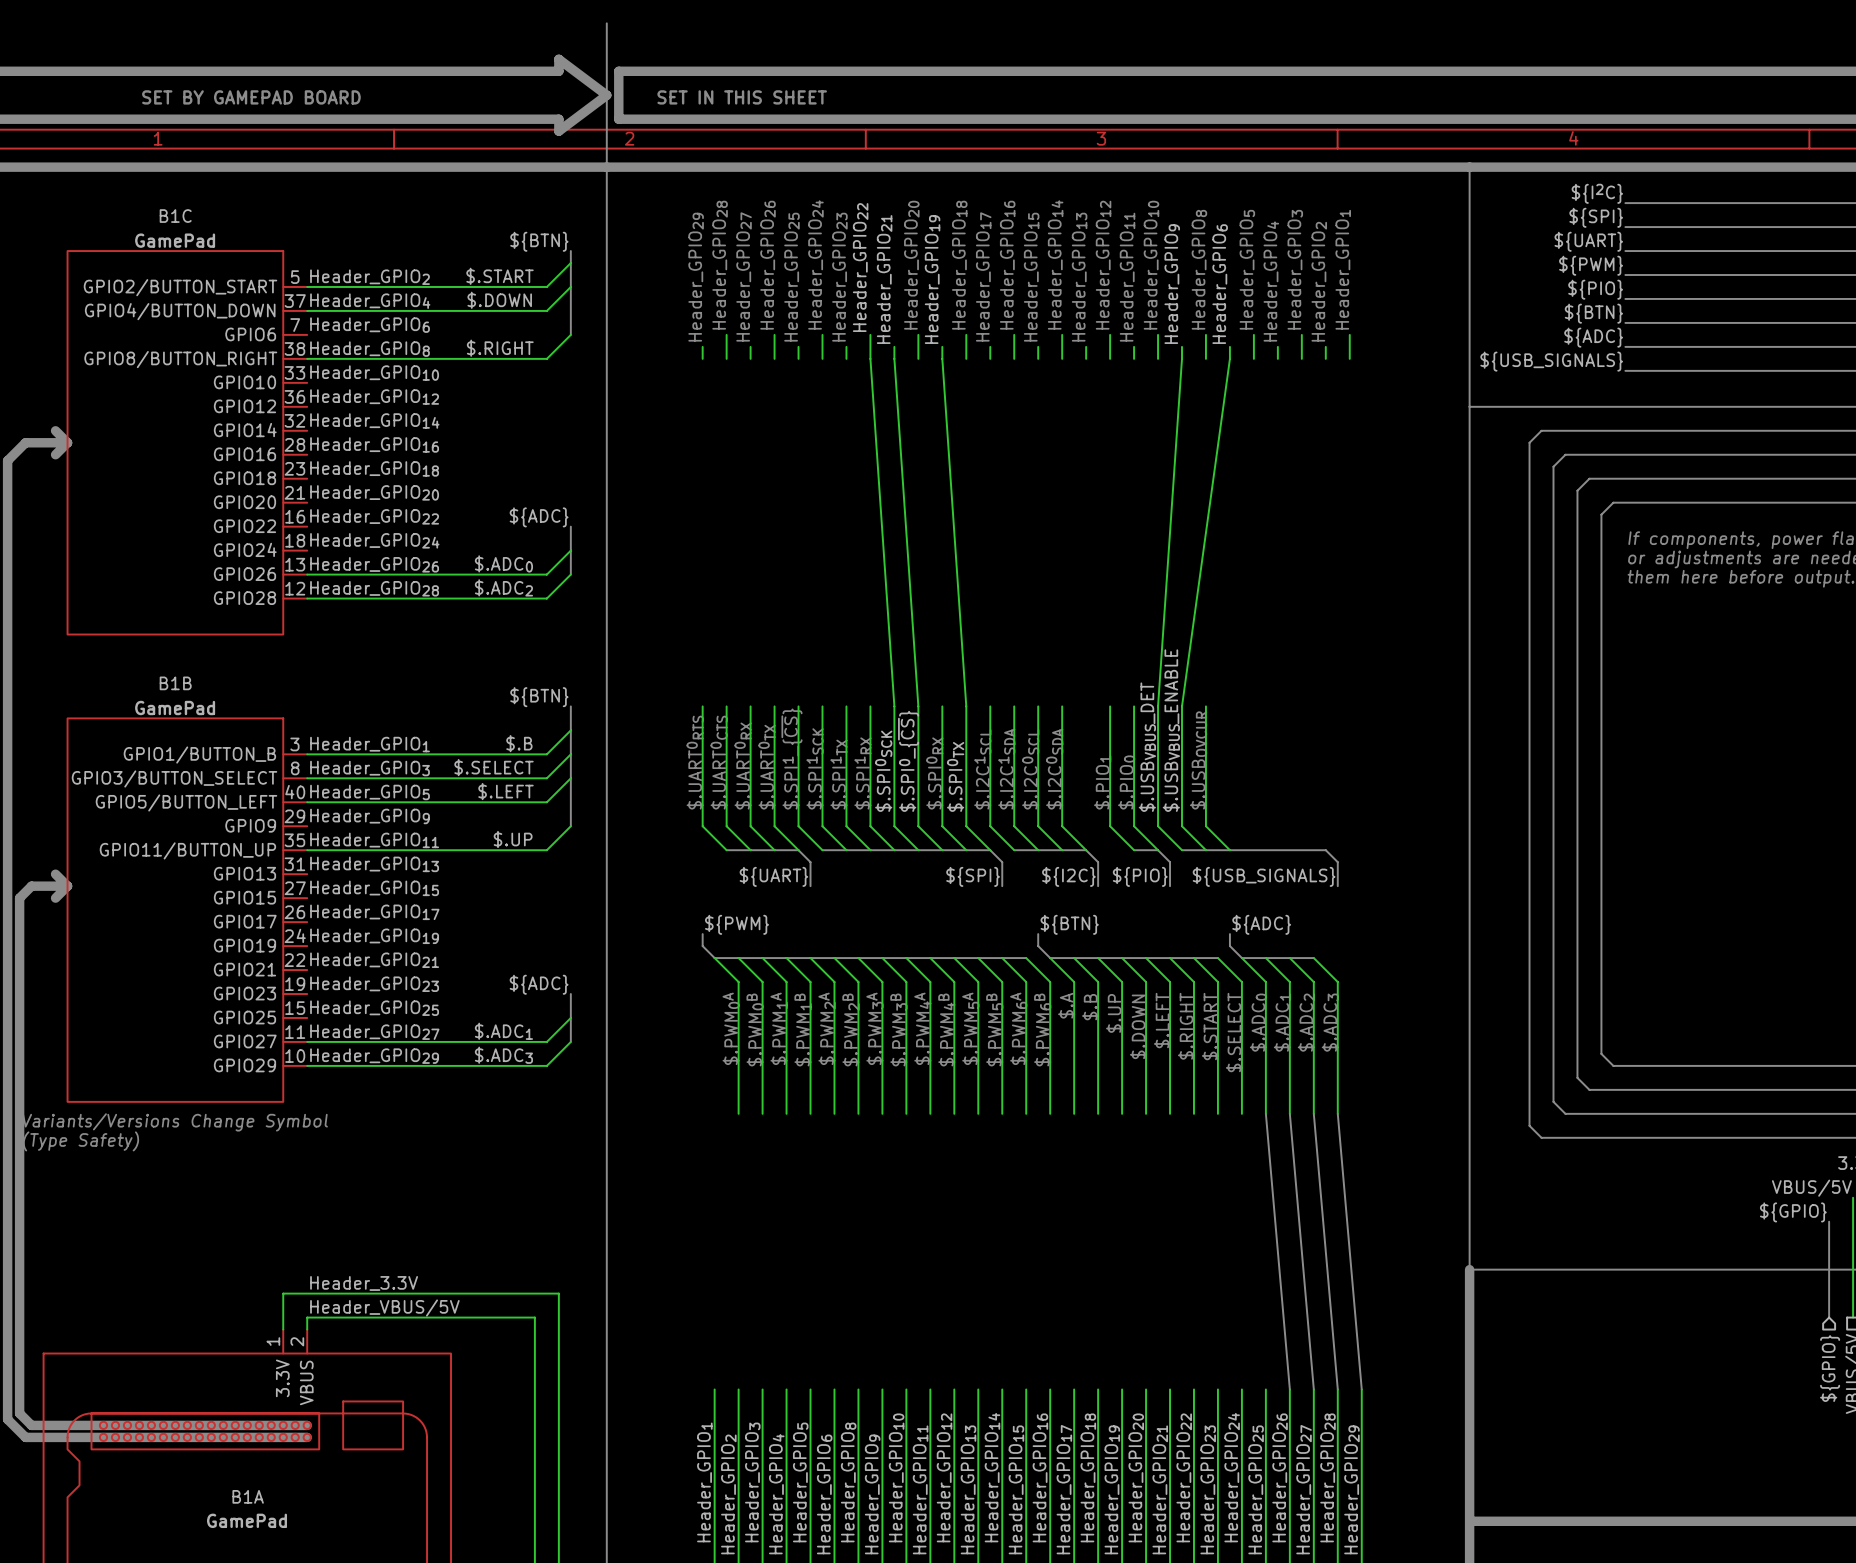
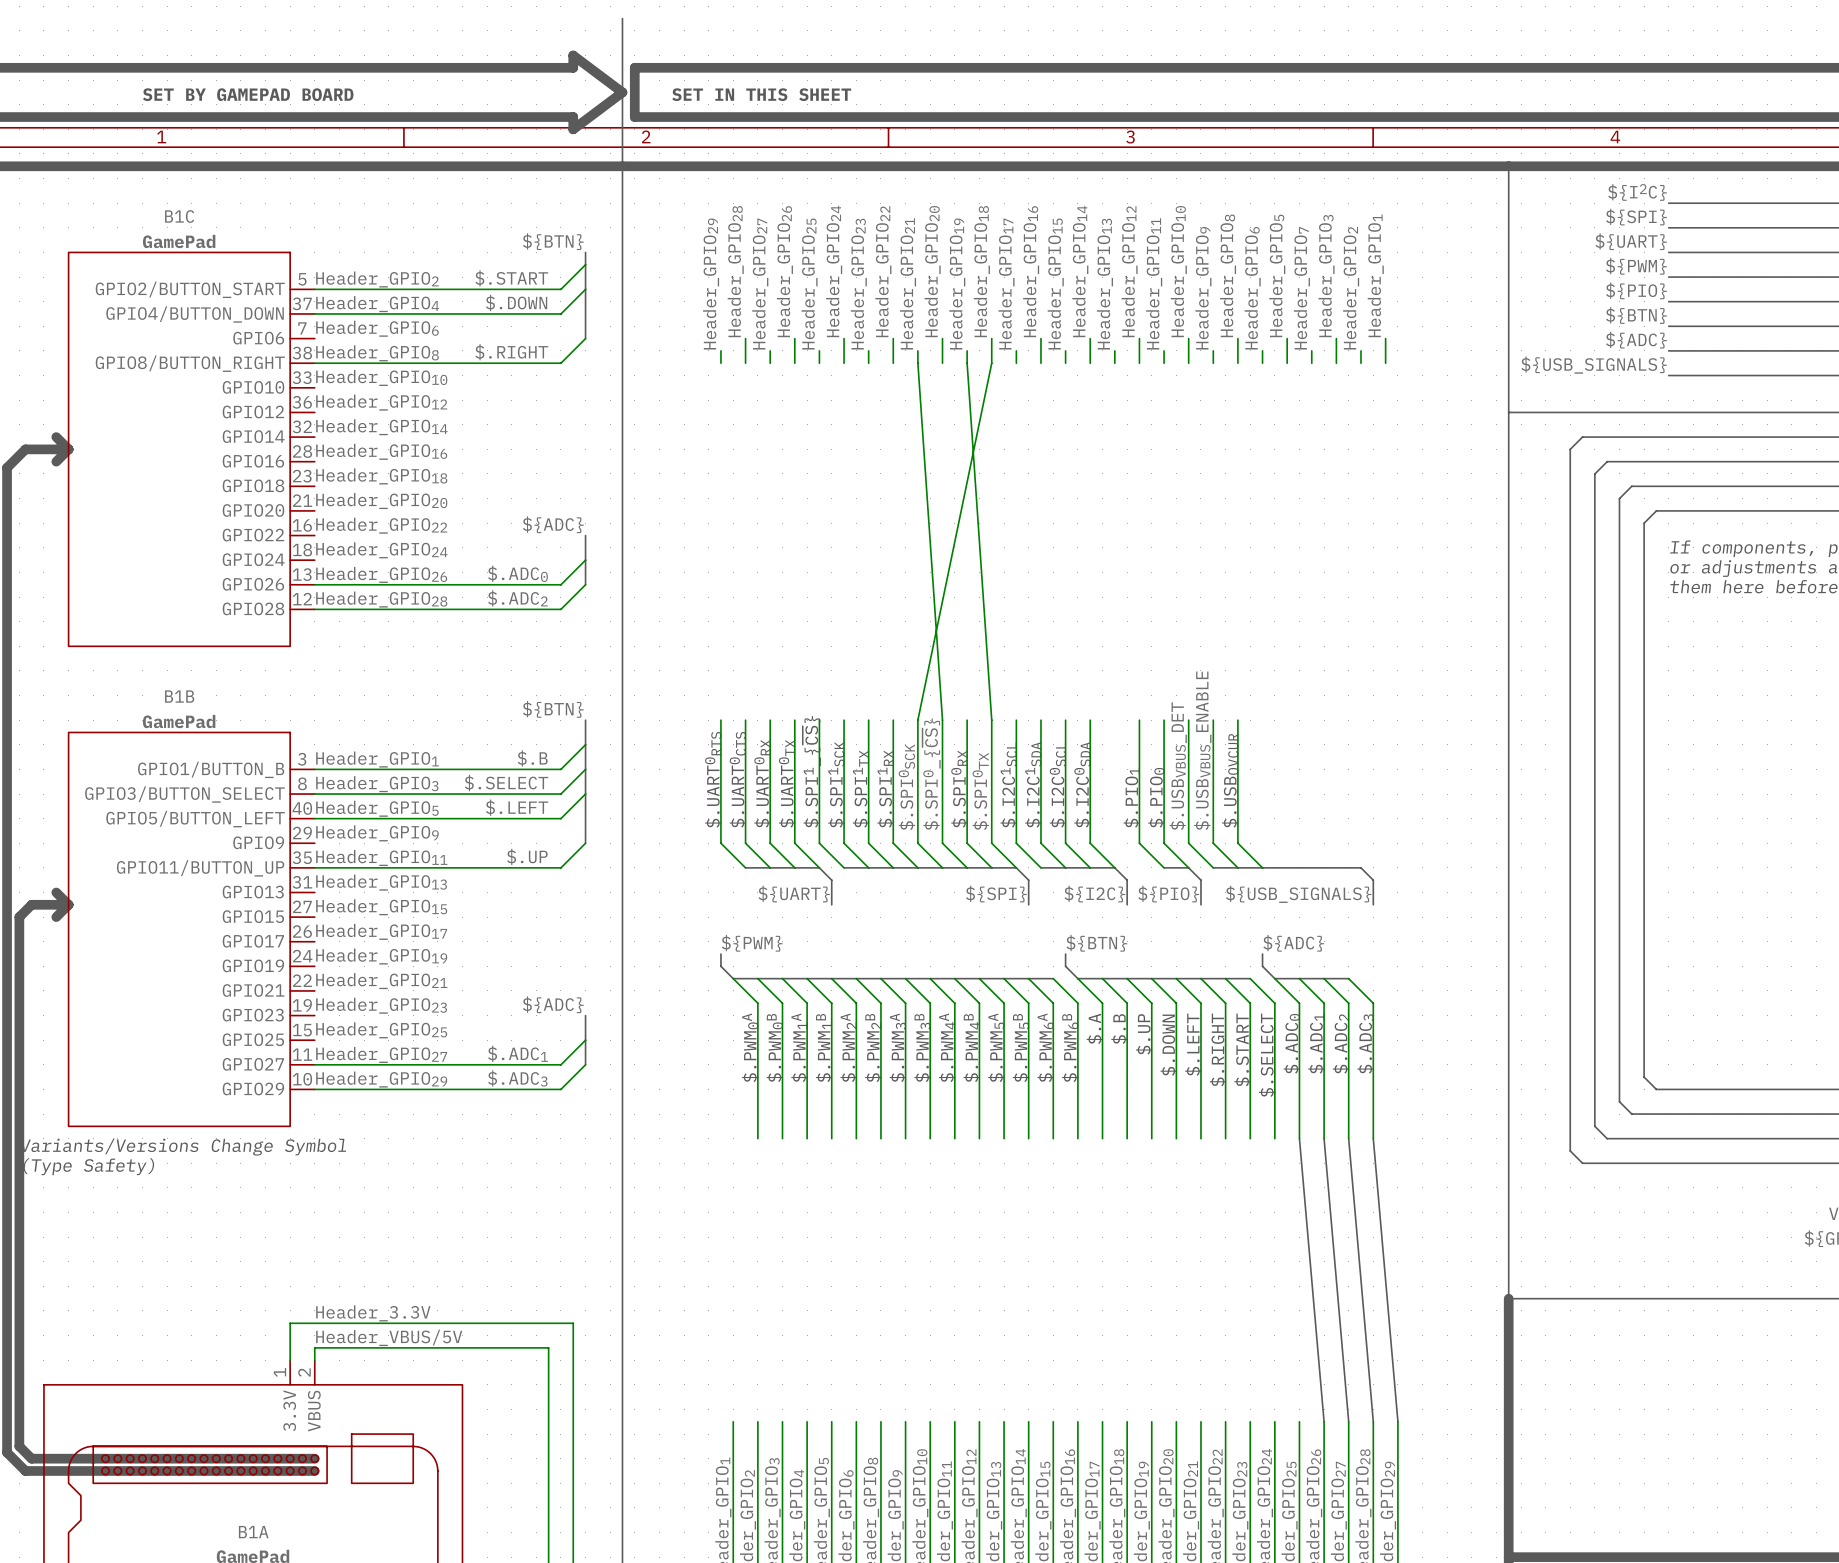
text: Header_GPIO24 (815, 264) -> none
text: Header_GPIO14 (1055, 264) -> none
text: Header_GPIO28 (720, 265) -> none
text: Header_GPIO26 (768, 265) -> none
text: Header_GPIO20 (911, 265) -> none
text: Header_GPIO18 (959, 265) -> none
text: Header_GPIO16 (1007, 265) -> none
text: Header_GPIO12 (1103, 265) -> none
text: Header_GPIO10 (1151, 265) -> none
label: none -> Header_GPIO28 (735, 271)
label: none -> Header_GPIO26 (784, 271)
label: none -> Header_GPIO24 (834, 271)
label: none -> Header_GPIO20 (932, 271)
label: none -> Header_GPIO18 (981, 271)
label: none -> Header_GPIO16 (1031, 271)
label: none -> Header_GPIO14 (1080, 271)
label: none -> Header_GPIO12 (1129, 271)
label: none -> Header_GPIO10 (1178, 271)
text: Header_GPIO8 (1199, 269) -> none
text: Header_GPIO5 (1247, 269) -> none
text: Header_GPIO3 (1295, 269) -> none
text: Header_GPIO1 (1343, 269) -> none
label: none -> Header_GPIO8 (1228, 275)
label: none -> Header_GPIO5 (1277, 275)
label: none -> Header_GPIO3 (1326, 276)
label: none -> Header_GPIO1 (1375, 275)
text: Header_GPIO27 (744, 276) -> none
text: Header_GPIO17 (983, 276) -> none
text: Header_GPIO29 (696, 277) -> none
text: Header_GPIO25 (791, 277) -> none
text: Header_GPIO23 (839, 277) -> none
text: Header_GPIO15 (1031, 277) -> none
text: Header_GPIO13 (1079, 277) -> none
text: Header_GPIO11 (1127, 277) -> none
label: none -> Header_GPIO29 (711, 283)
label: none -> Header_GPIO27 (760, 284)
label: none -> Header_GPIO25 (809, 284)
label: none -> Header_GPIO23 (858, 284)
label: none -> Header_GPIO17 (1006, 284)
label: none -> Header_GPIO15 (1055, 284)
label: none -> Header_GPIO13 (1104, 284)
label: none -> Header_GPIO11 (1154, 283)
text: Header_GPIO4 (1271, 281) -> none
text: Header_GPIO2 (1319, 281) -> none
label: none -> Header_GPIO7 (1301, 288)
label: none -> Header_GPIO2 (1351, 288)
wire: (870, 358) (894, 706) -> (991, 363) (917, 720)
wire: (1182, 358) (1158, 706) -> none
wire: (1229, 358) (1182, 706) -> none

